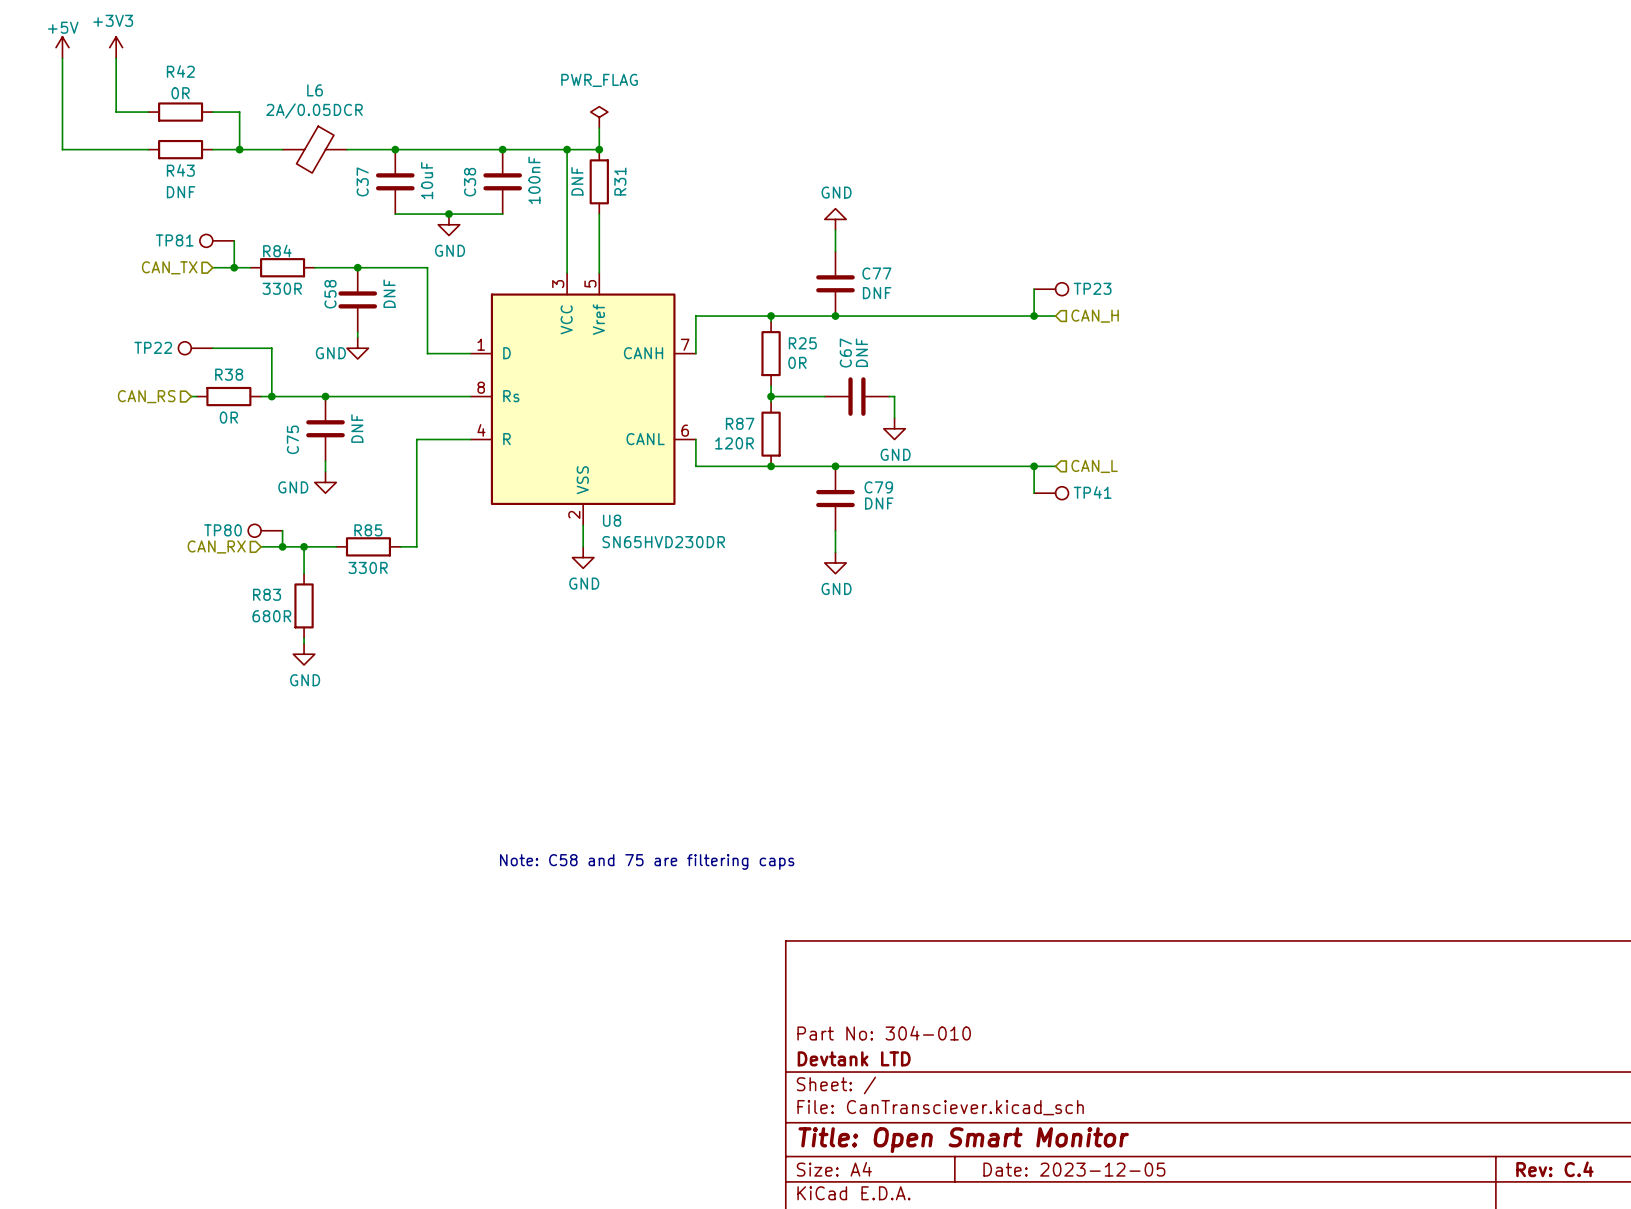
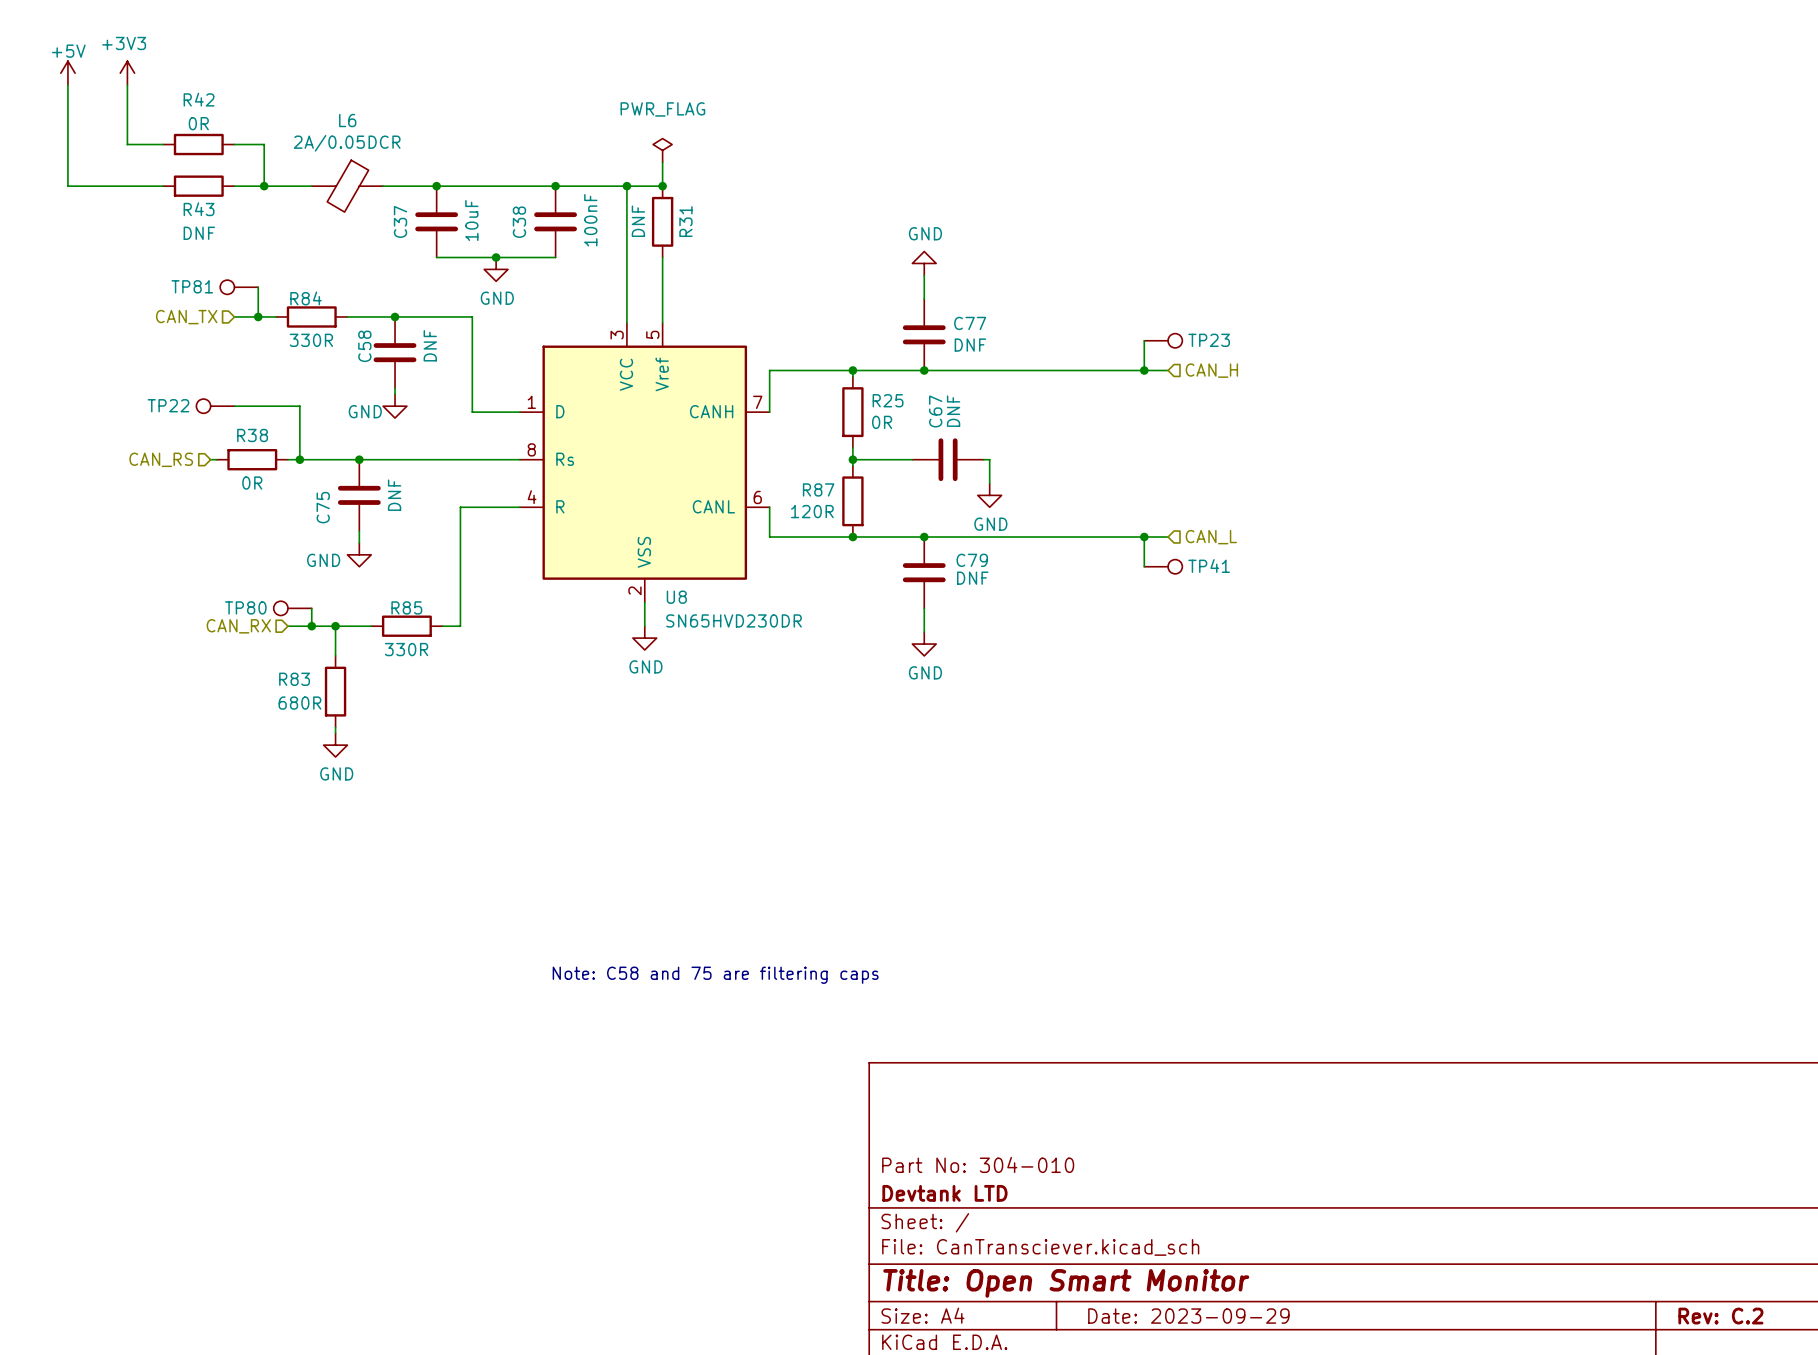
title block: Date: 2023-12-05 (1074, 1169) -> Date: 2023-09-29 (1188, 1316)
title block: Rev: C.4 (1554, 1169) -> Rev: C.2 (1720, 1316)

